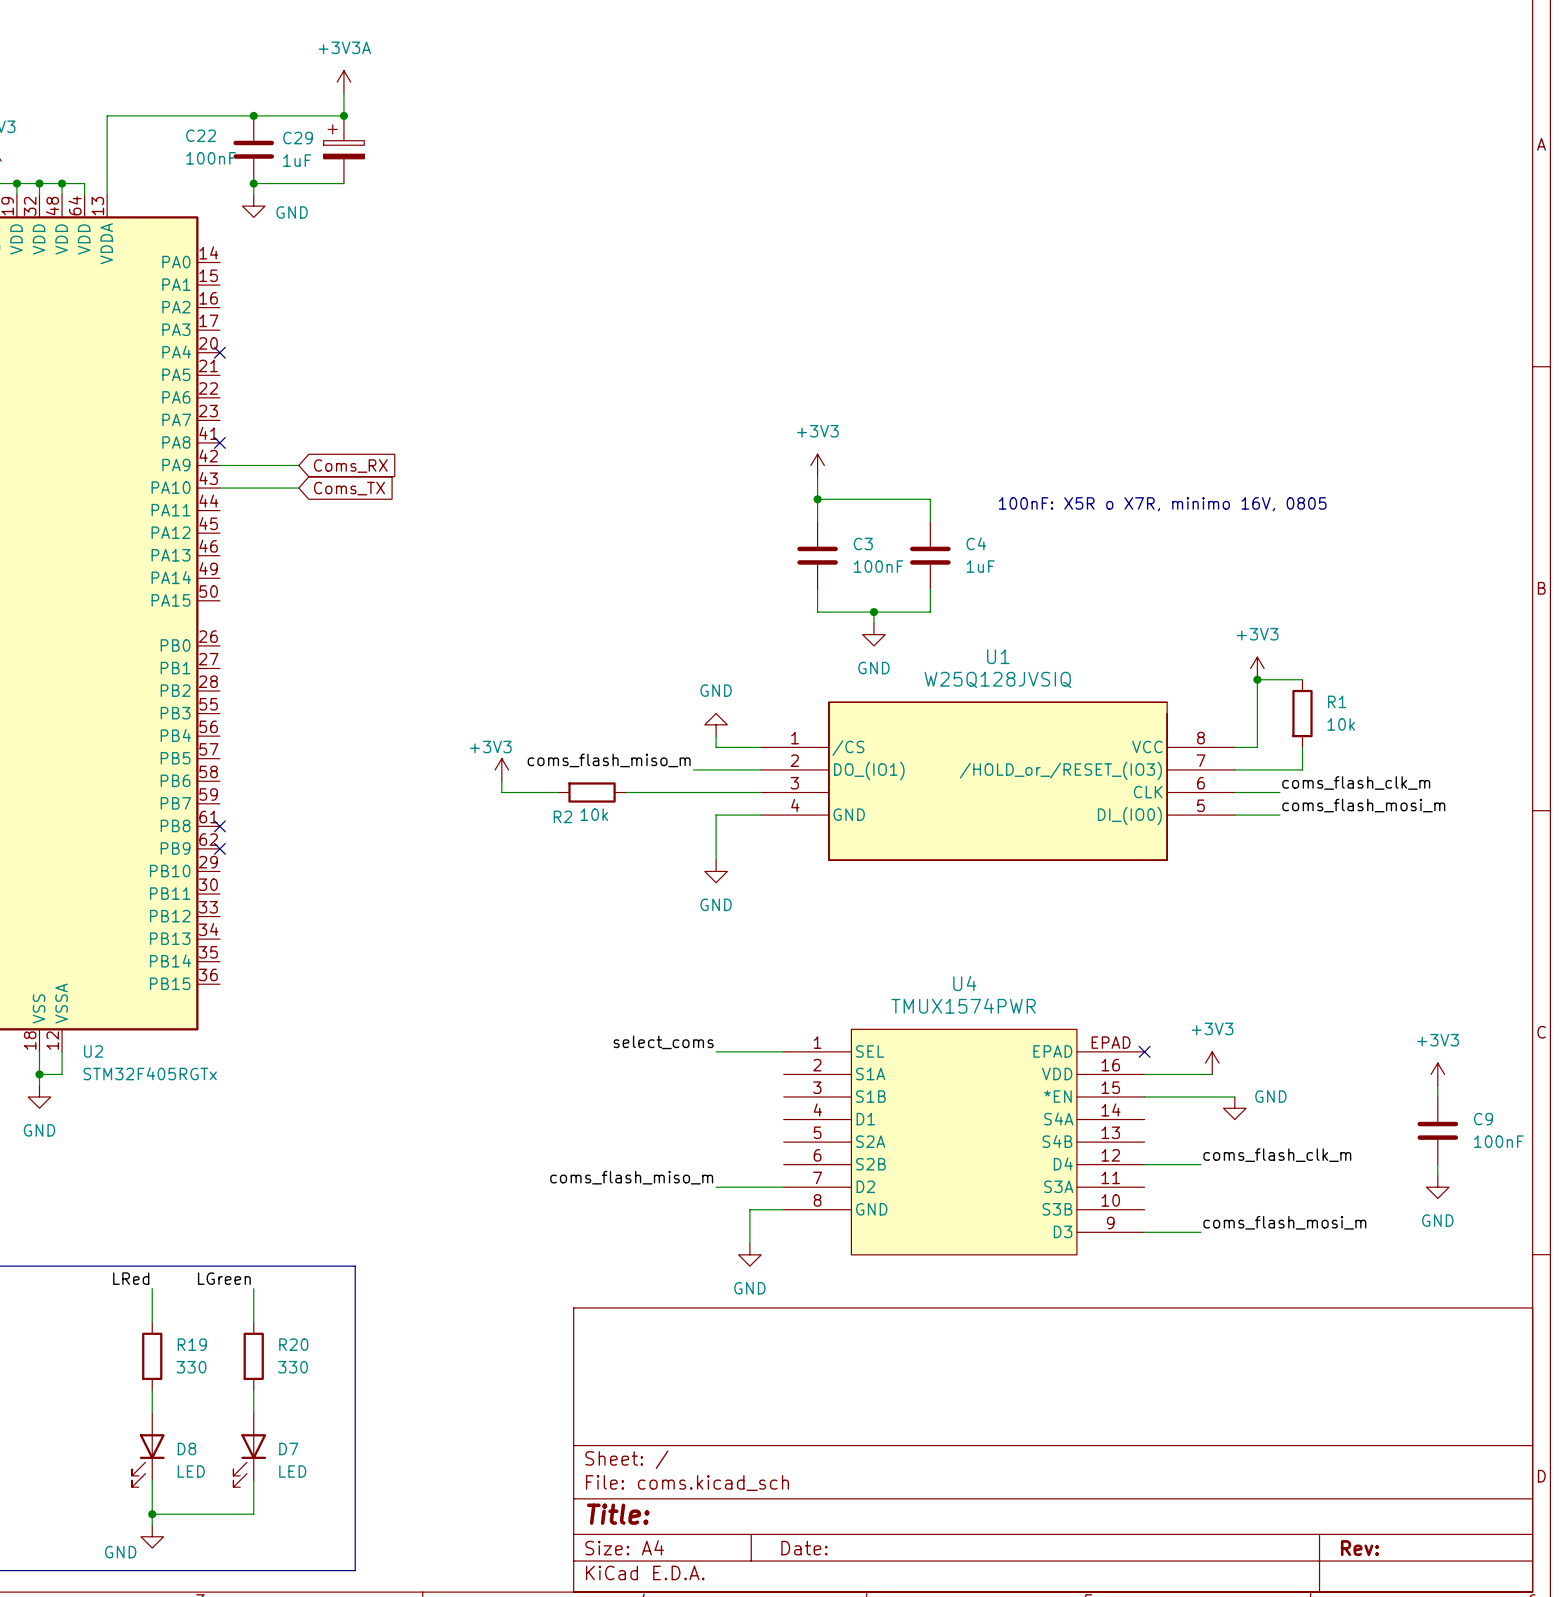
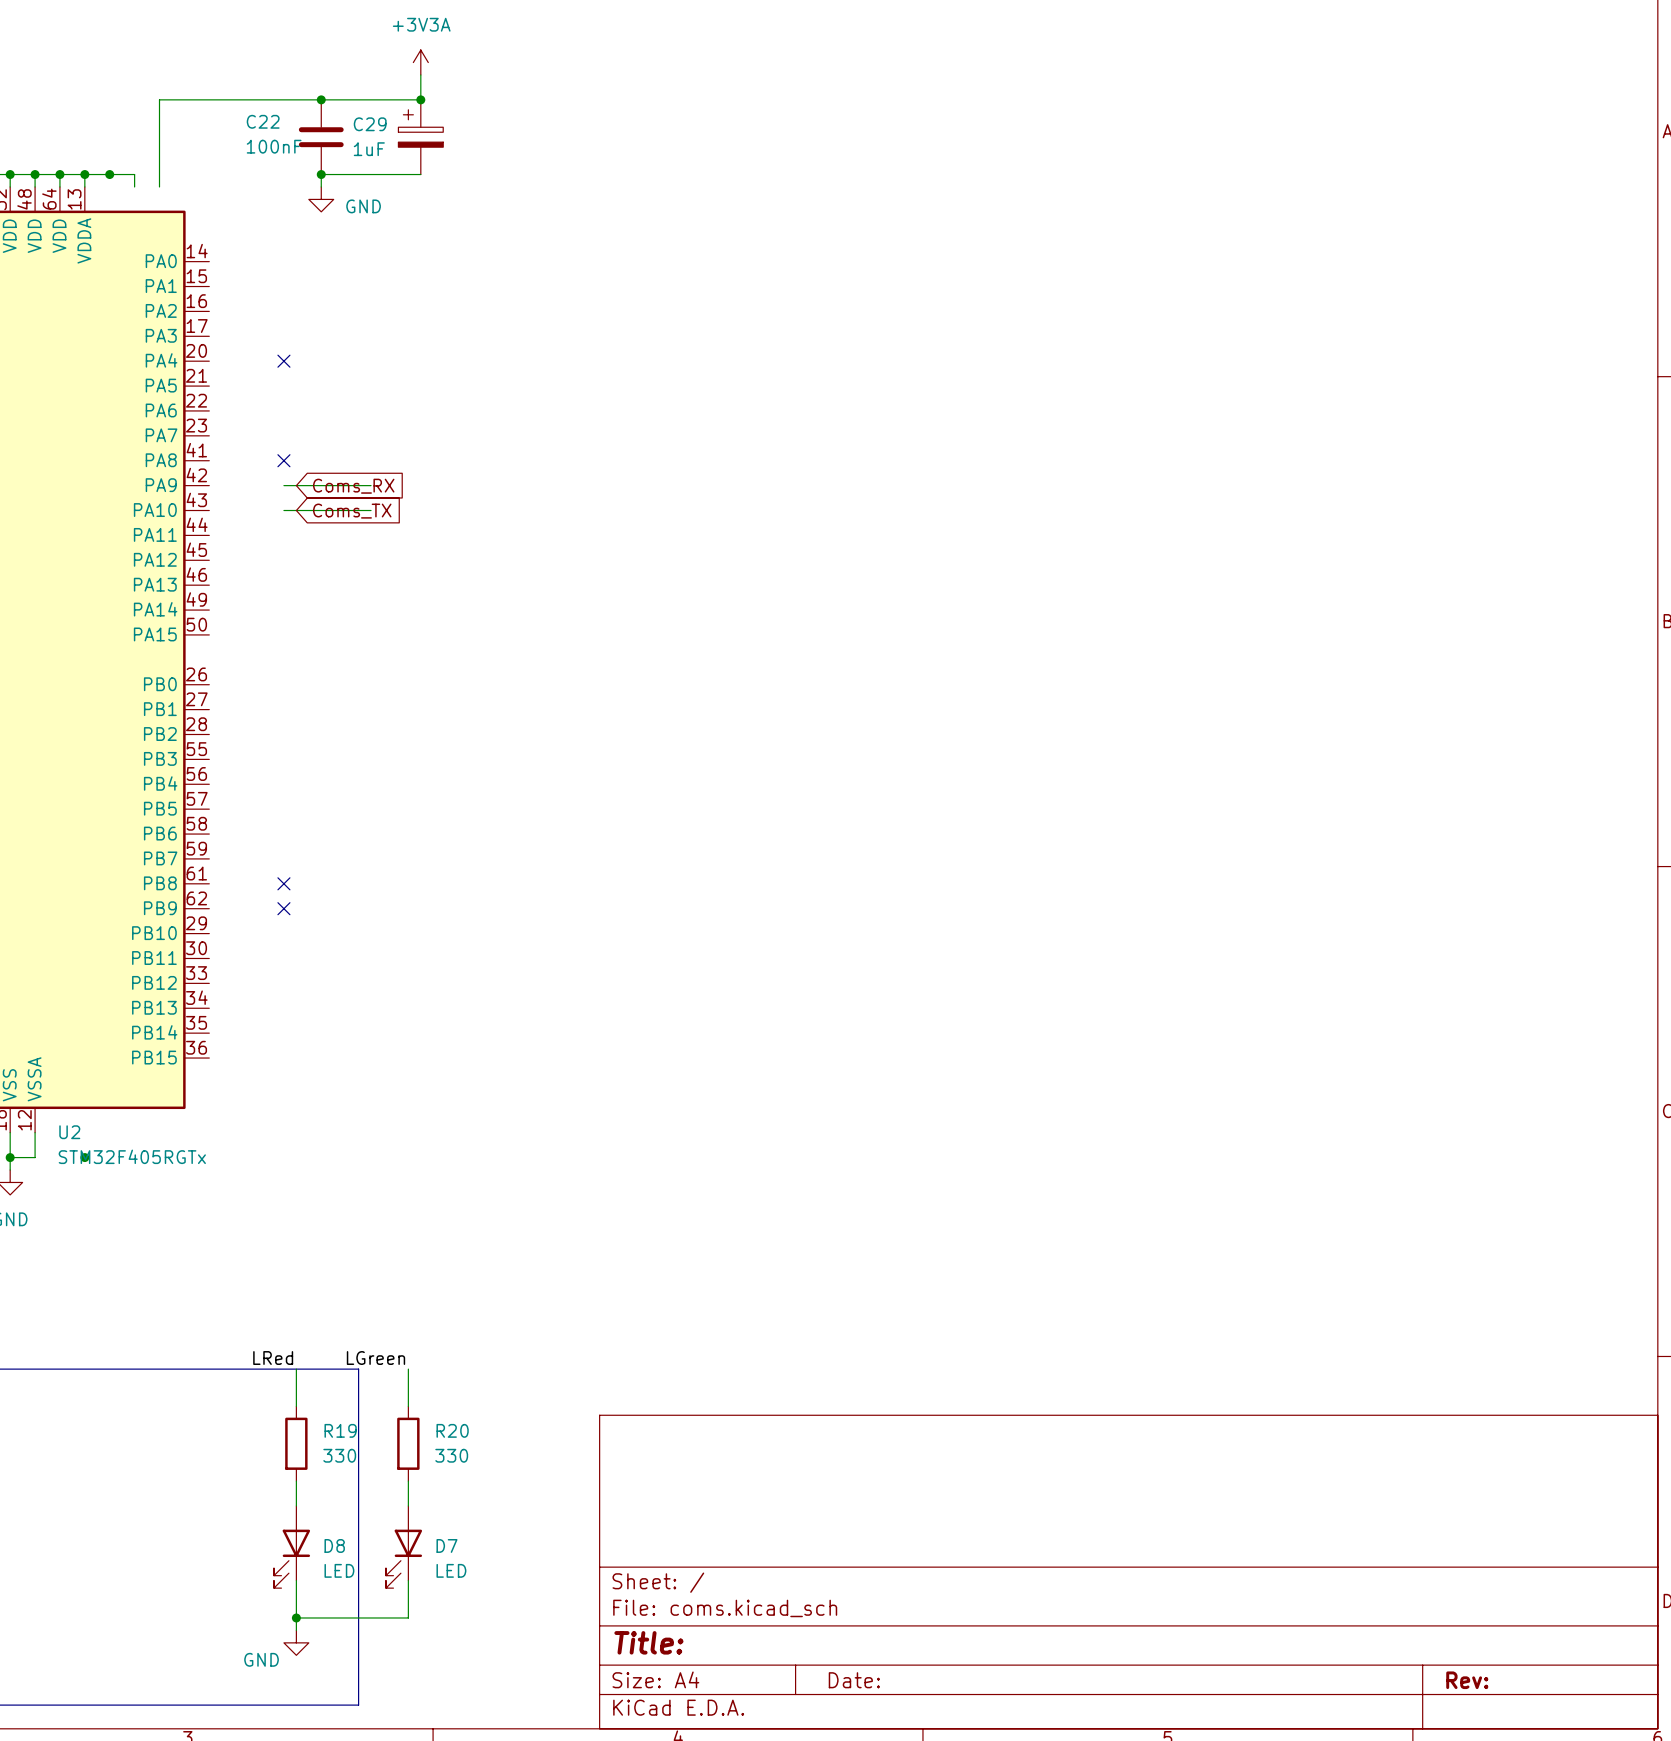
power symbol position: +3V3A (343, 82) -> +3V3A (420, 62)
wire: (343, 93) (343, 115) -> (420, 74) (420, 99) (346, 99)
wire: (174, 115) (107, 115) (107, 183) -> (159, 99) (159, 186)
junction: (253, 115) -> none
junction position: (343, 115) -> (321, 99)
junction: none -> (420, 99)
C22 position: (253, 149) -> (321, 137)
C29 position: (343, 149) -> (420, 137)
wire: none -> (59, 174) (134, 174) (134, 186)
junction: none -> (59, 174)
junction: none -> (84, 174)
junction: none -> (109, 174)
junction: (253, 183) -> none
wire: (321, 183) (253, 183) (253, 194) -> (321, 174) (321, 186)
junction: none -> (321, 174)
wire: none -> (346, 174) (420, 174)
power symbol position: GND (253, 206) -> GND (321, 199)
no-connect mark: (219, 352) -> none
no-connect mark: none -> (283, 361)
no-connect mark: (219, 442) -> none
no-connect mark: none -> (283, 460)
wire: (219, 465) (287, 465) -> (296, 485) (371, 485)
power symbol: +3V3 (817, 465) -> none
wire: (817, 476) (817, 521) -> none
wire: (219, 488) (287, 488) -> (296, 510) (371, 510)
wire: (817, 499) (930, 499) (930, 521) -> none
junction: (817, 499) -> none
text: 100nF: X5R o X7R, minimo 16V, 0805 (1162, 504) -> none
C3: 100nF (817, 555) -> none
C4: 1uF (930, 555) -> none
wire: (817, 589) (817, 612) (930, 612) (930, 589) -> none
wire: (873, 612) (873, 623) -> none
junction: (873, 612) -> none
power symbol: GND (873, 634) -> none
power symbol: +3V3 (1257, 668) -> none
junction: (1257, 679) -> none
wire: (1302, 679) (1257, 679) (1257, 747) (1234, 747) -> none
R1: 10k (1302, 713) -> none
power symbol: GND (716, 724) -> none
wire: (716, 736) (716, 747) (761, 747) -> none
wire: (1302, 747) (1302, 769) (1234, 769) -> none
label: coms_flash_miso_m (609, 760) -> none
power symbol: +3V3 (501, 769) -> none
wire: (693, 769) (761, 769) -> none
wire: (501, 781) (501, 792) (558, 792) -> none
U1: W25Q128JVSIQ (998, 781) -> none
label: coms_flash_clk_m (1356, 782) -> none
R2: 10k (592, 792) -> none
wire: (625, 792) (761, 792) -> none
wire: (1234, 792) (1279, 792) -> none
label: coms_flash_mosi_m (1363, 805) -> none
wire: (761, 815) (716, 815) (716, 860) -> none
wire: (1234, 815) (1279, 815) -> none
no-connect mark: (219, 826) -> none
no-connect mark: none -> (283, 883)
no-connect mark: (219, 848) -> none
no-connect mark: none -> (283, 908)
power symbol: GND (716, 871) -> none
label: select_coms (663, 1042) -> none
wire: (716, 1051) (783, 1051) -> none
no-connect mark: (1144, 1051) -> none
power symbol: +3V3 (1212, 1063) -> none
junction: none -> (84, 1157)
wire: (1144, 1074) (1212, 1074) -> none
power symbol: +3V3 (1437, 1074) -> none
wire: (1437, 1085) (1437, 1096) -> none
wire: (1144, 1096) (1234, 1096) -> none
power symbol: GND (1234, 1108) -> none
C9: 100nF (1437, 1130) -> none
U4: TMUX1574PWR (964, 1142) -> none
label: coms_flash_clk_m (1277, 1155) -> none
wire: (1144, 1164) (1200, 1164) -> none
wire: (1437, 1164) (1437, 1175) -> none
label: coms_flash_miso_m (631, 1177) -> none
wire: (716, 1187) (783, 1187) -> none
power symbol: GND (1437, 1187) -> none
wire: (783, 1209) (749, 1209) (749, 1243) -> none
label: coms_flash_mosi_m (1284, 1222) -> none
wire: (1144, 1232) (1200, 1232) -> none
power symbol: GND (749, 1254) -> none
label position: LRed (131, 1278) -> LRed (273, 1358)
label position: LGreen (224, 1278) -> LGreen (375, 1358)
wire: (152, 1288) (152, 1322) -> (296, 1369) (296, 1406)
wire: (253, 1288) (253, 1322) -> (408, 1369) (408, 1406)
R19 position: (152, 1356) -> (296, 1443)
R20 position: (253, 1356) -> (408, 1443)
wire: (152, 1390) (152, 1412) -> (296, 1481) (296, 1506)
wire: (253, 1390) (253, 1412) -> (408, 1481) (408, 1506)
D8 position: (148, 1449) -> (292, 1547)
D7 position: (249, 1449) -> (404, 1547)
wire: (152, 1480) (152, 1525) -> (296, 1580) (296, 1630)
wire: (253, 1480) (253, 1514) (152, 1514) -> (408, 1580) (408, 1617) (296, 1617)
junction: none -> (296, 1617)
junction: (152, 1514) -> none
power symbol: none -> GND (296, 1642)
power symbol: GND (152, 1536) -> none

